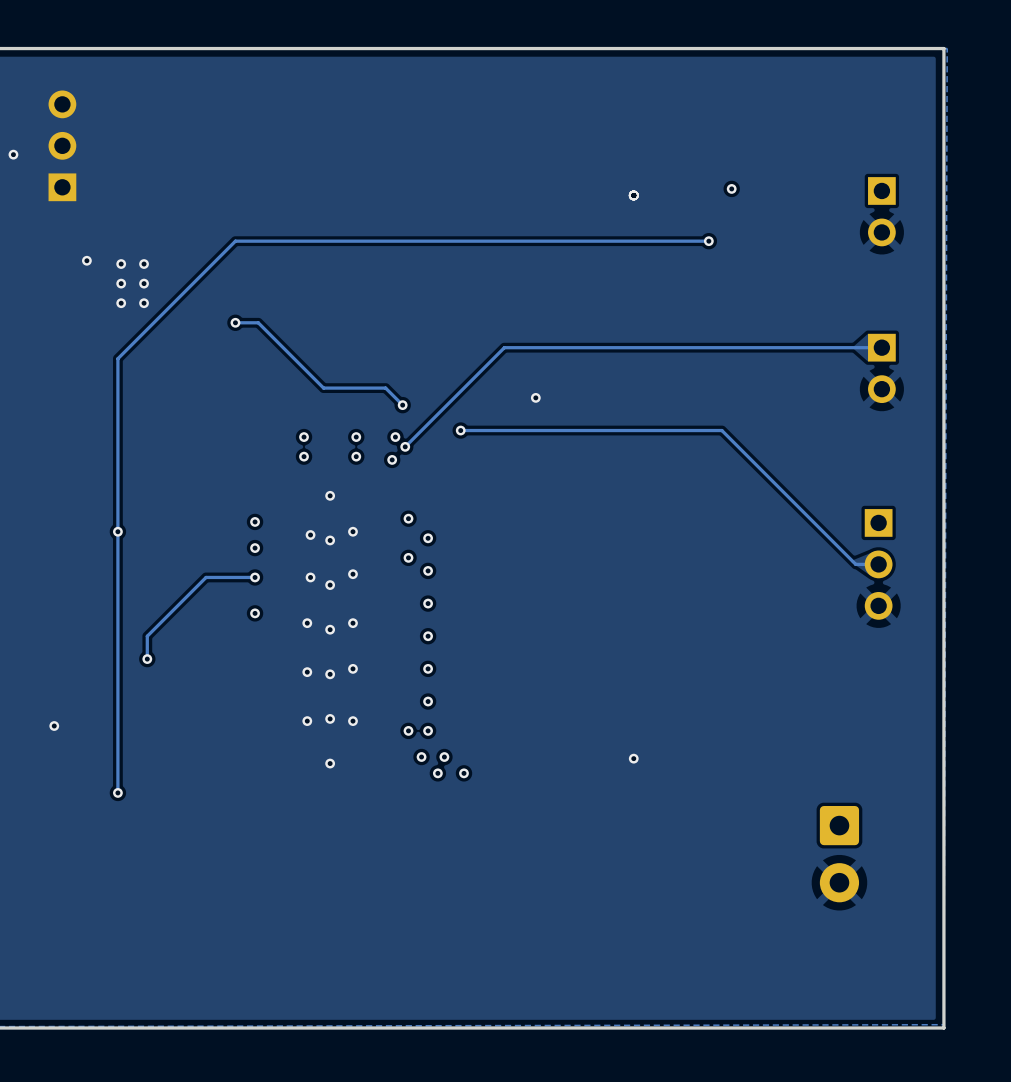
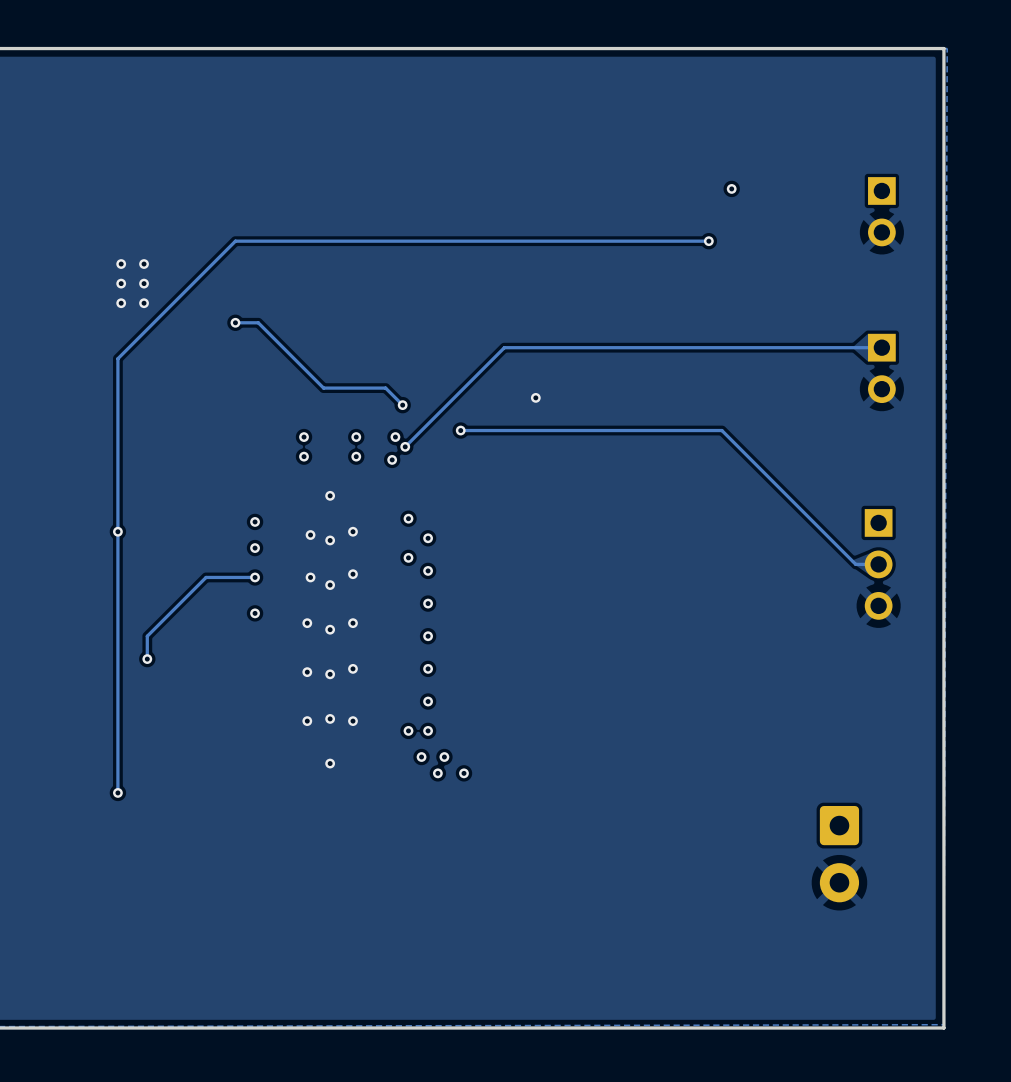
part: (62, 145) -> none
via: (13, 154) -> none
via: (633, 195) -> none
via: (86, 260) -> none
via: (54, 726) -> none
via: (633, 758) -> none

